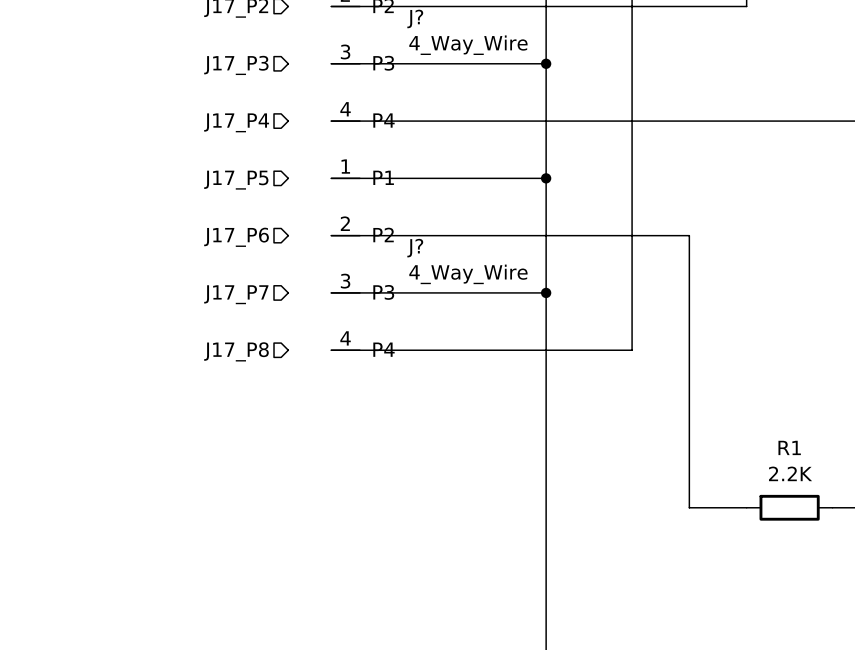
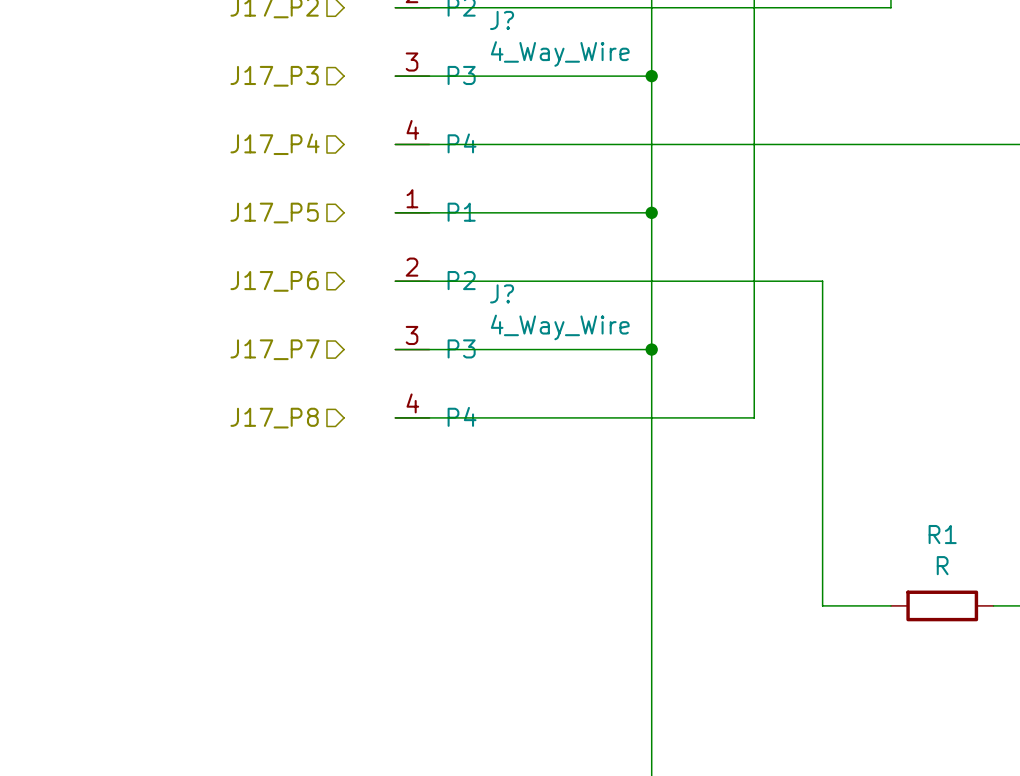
R1 value: 2.2K (790, 473) -> R (942, 565)

